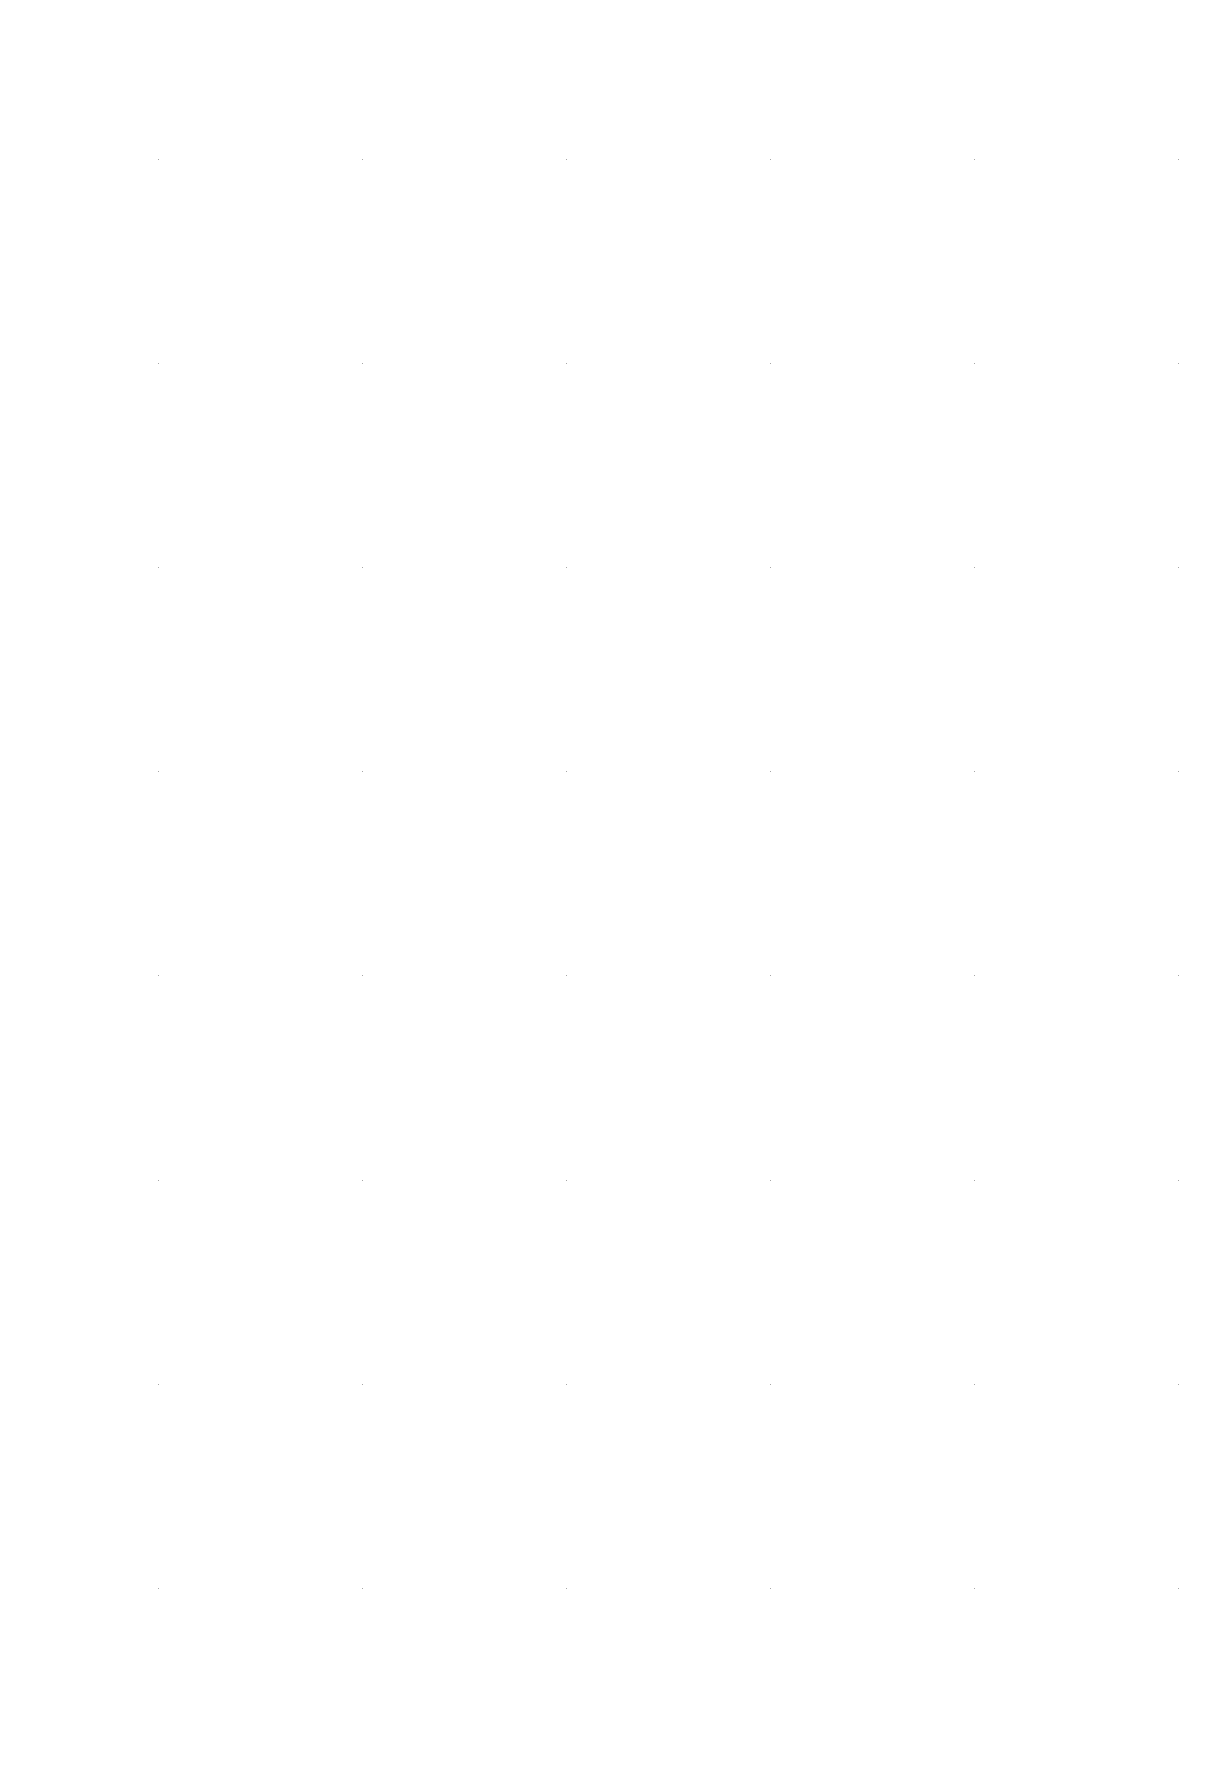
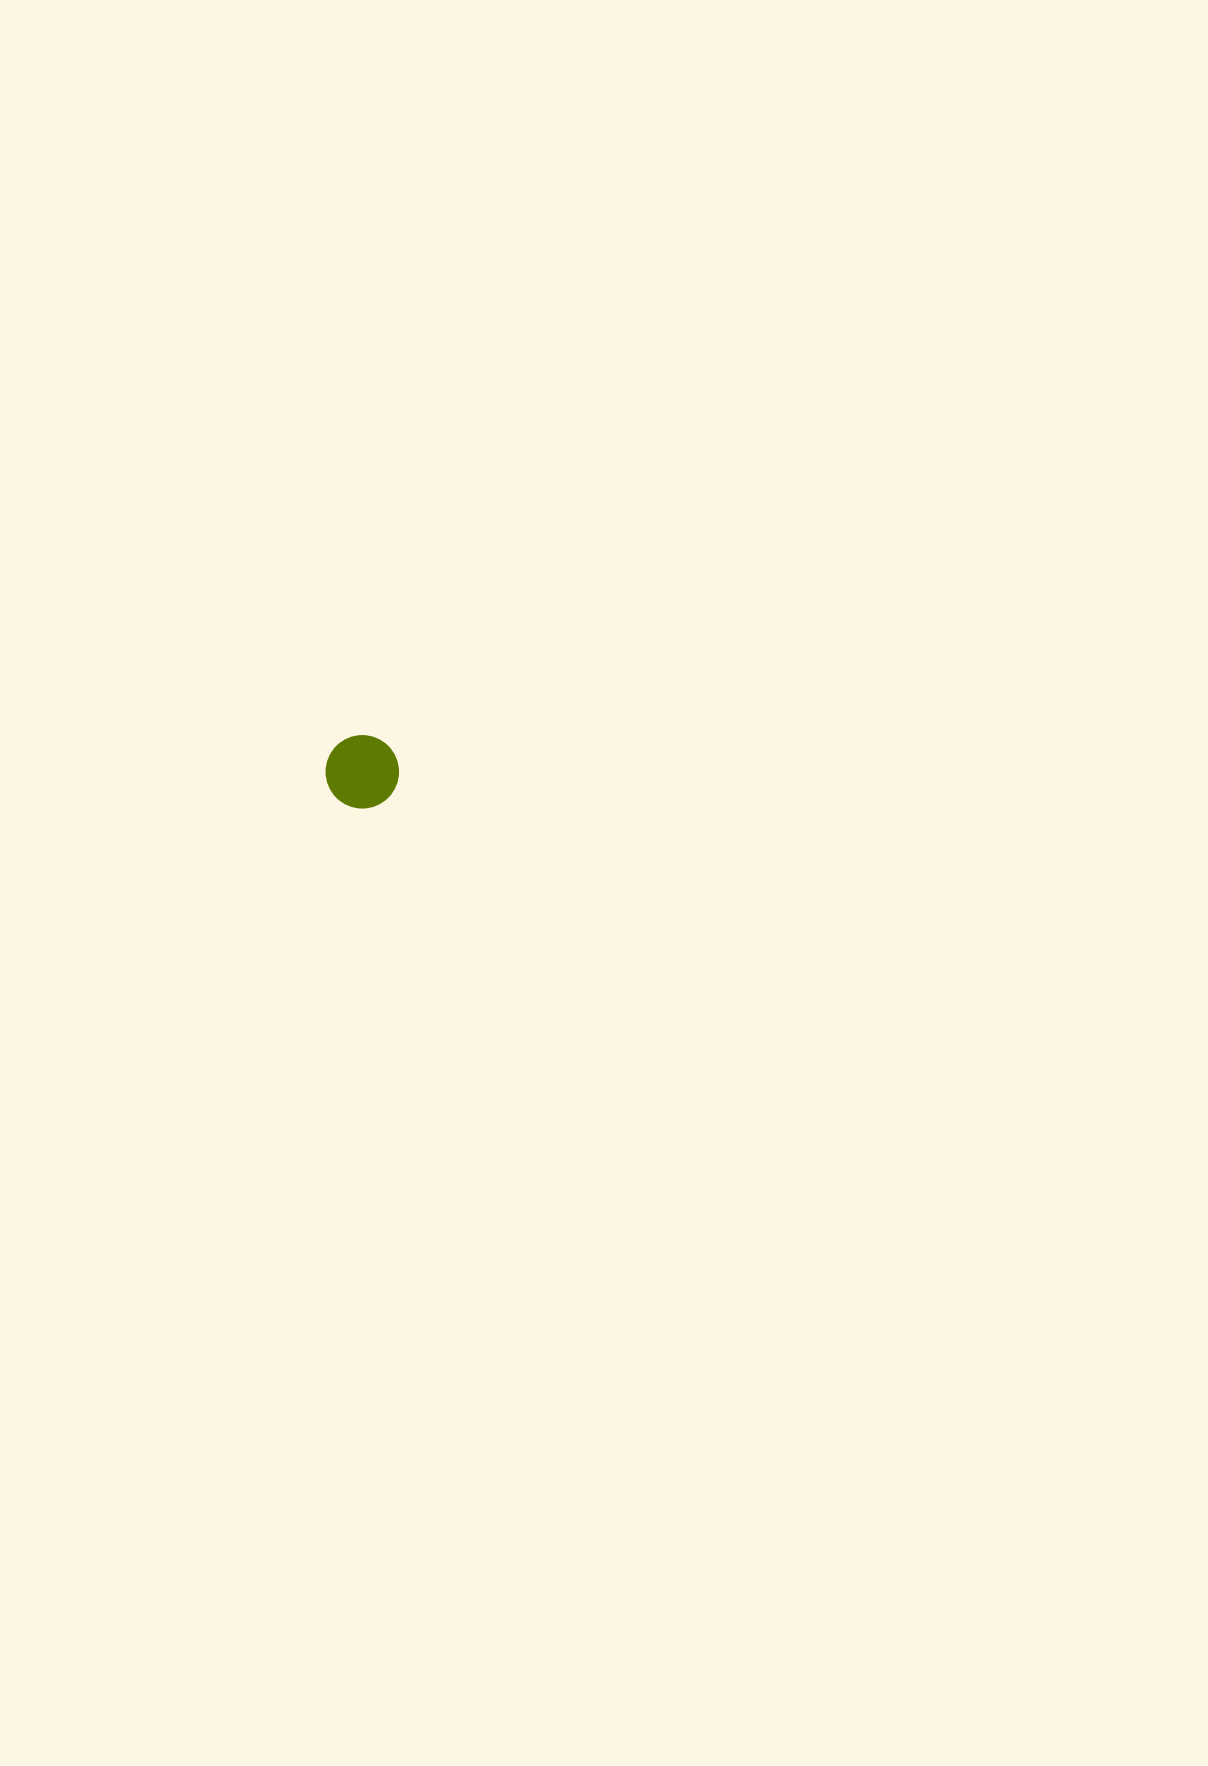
junction: none -> (362, 771)

